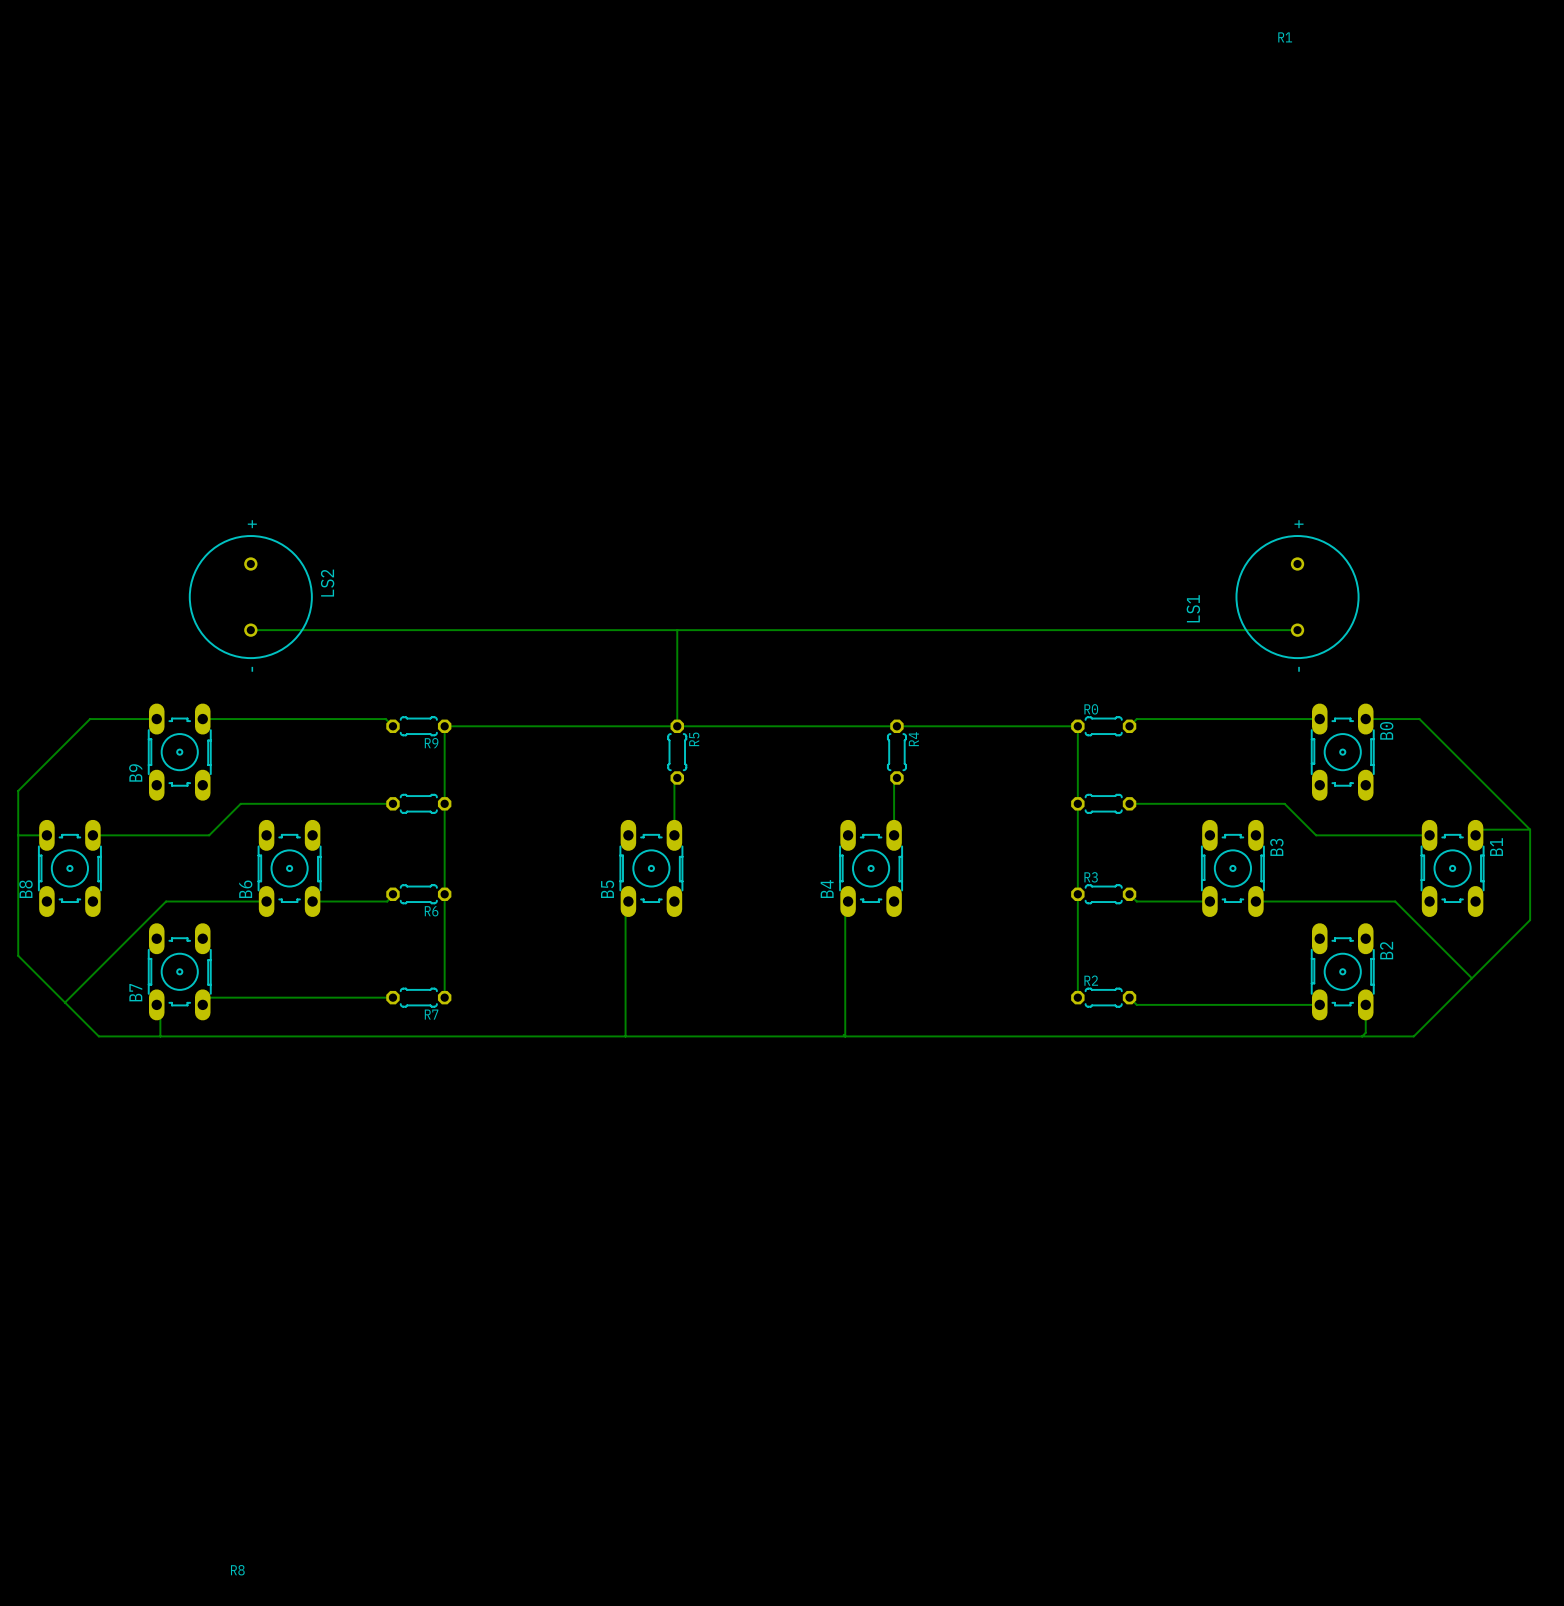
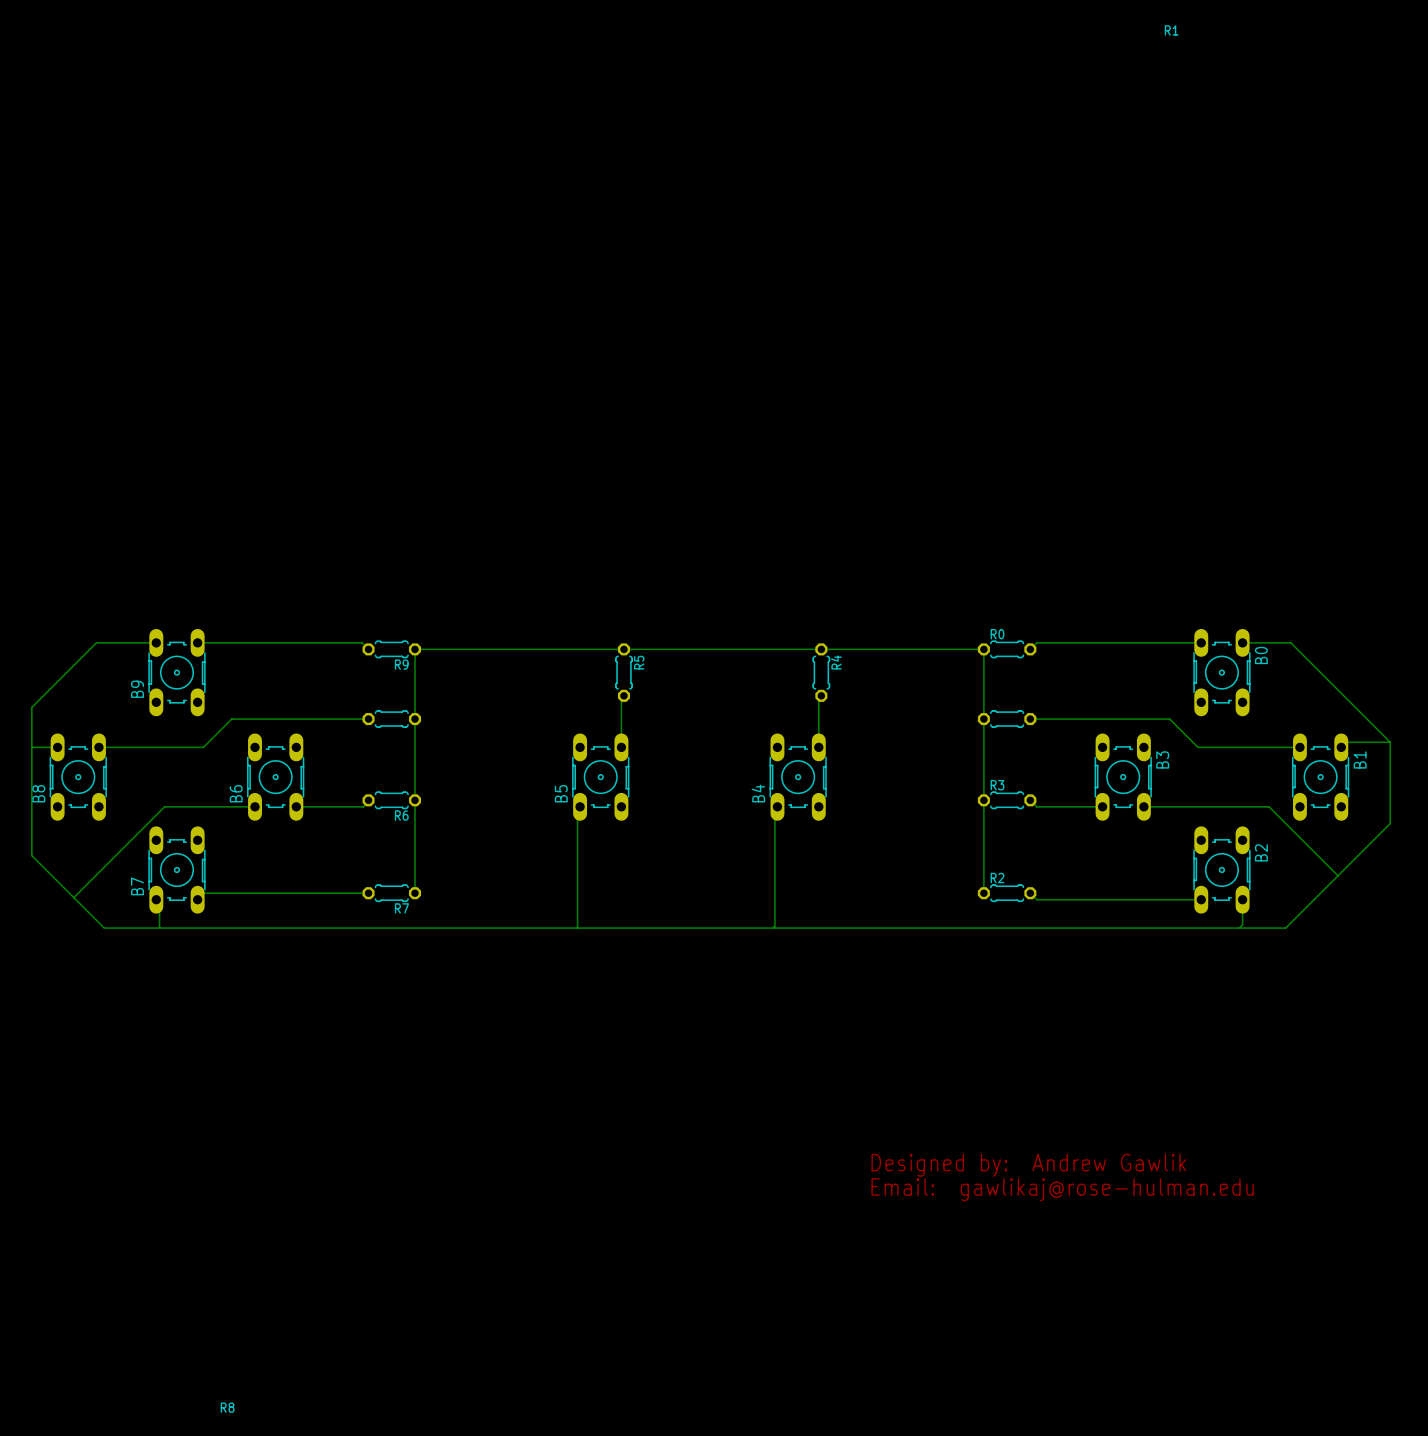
LS2: (250, 597) -> none
LS1: (1297, 597) -> none
bottom track: (250, 630) (1297, 630) -> none
bottom track: (677, 630) (677, 726) -> none
text: none -> Designed by: Andrew Gawlik (1028, 1165)
text: none -> Email: gawlikaj@rose-hulman.edu (1062, 1189)

